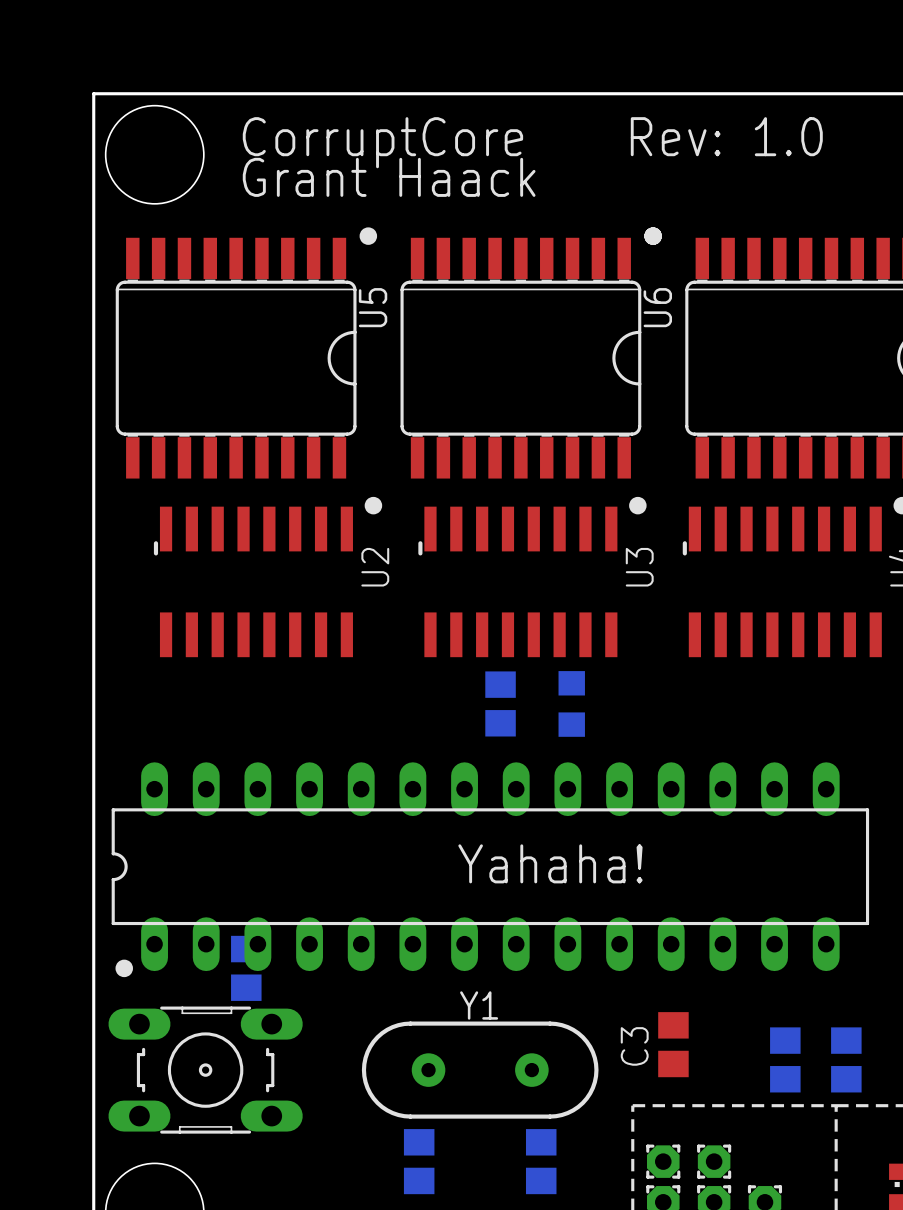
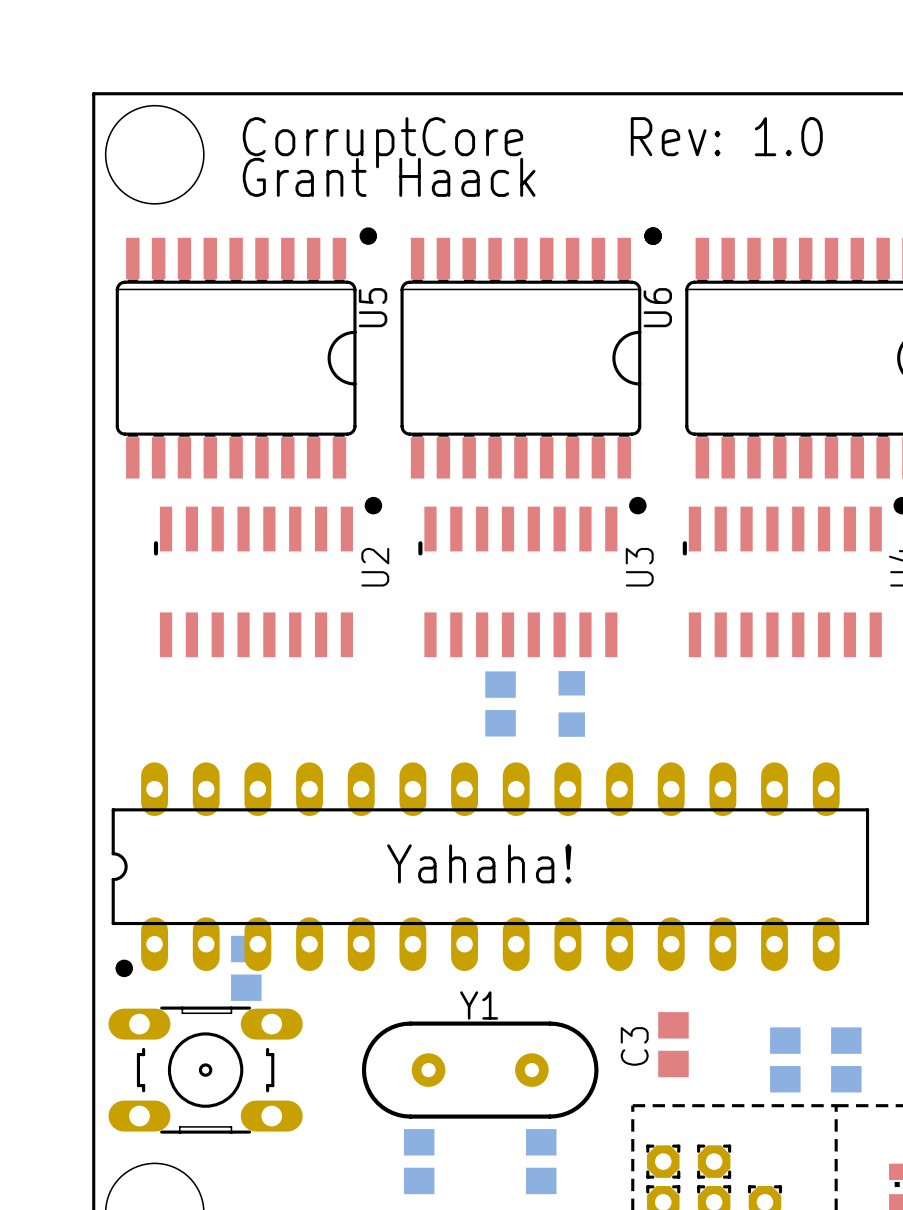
text position: Yahaha! (550, 863) -> Yahaha! (479, 863)

